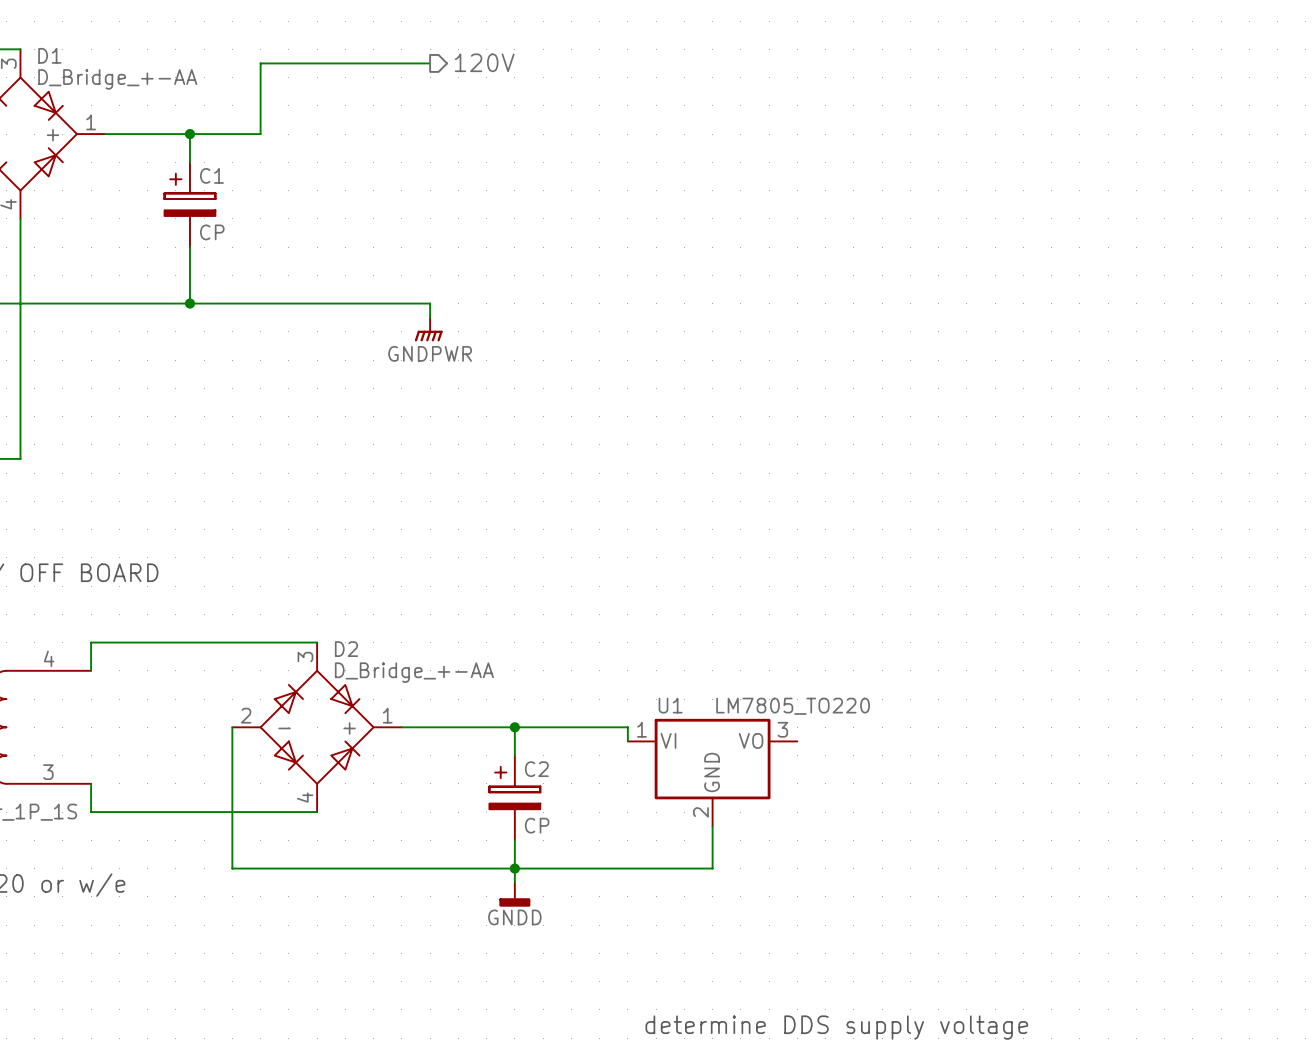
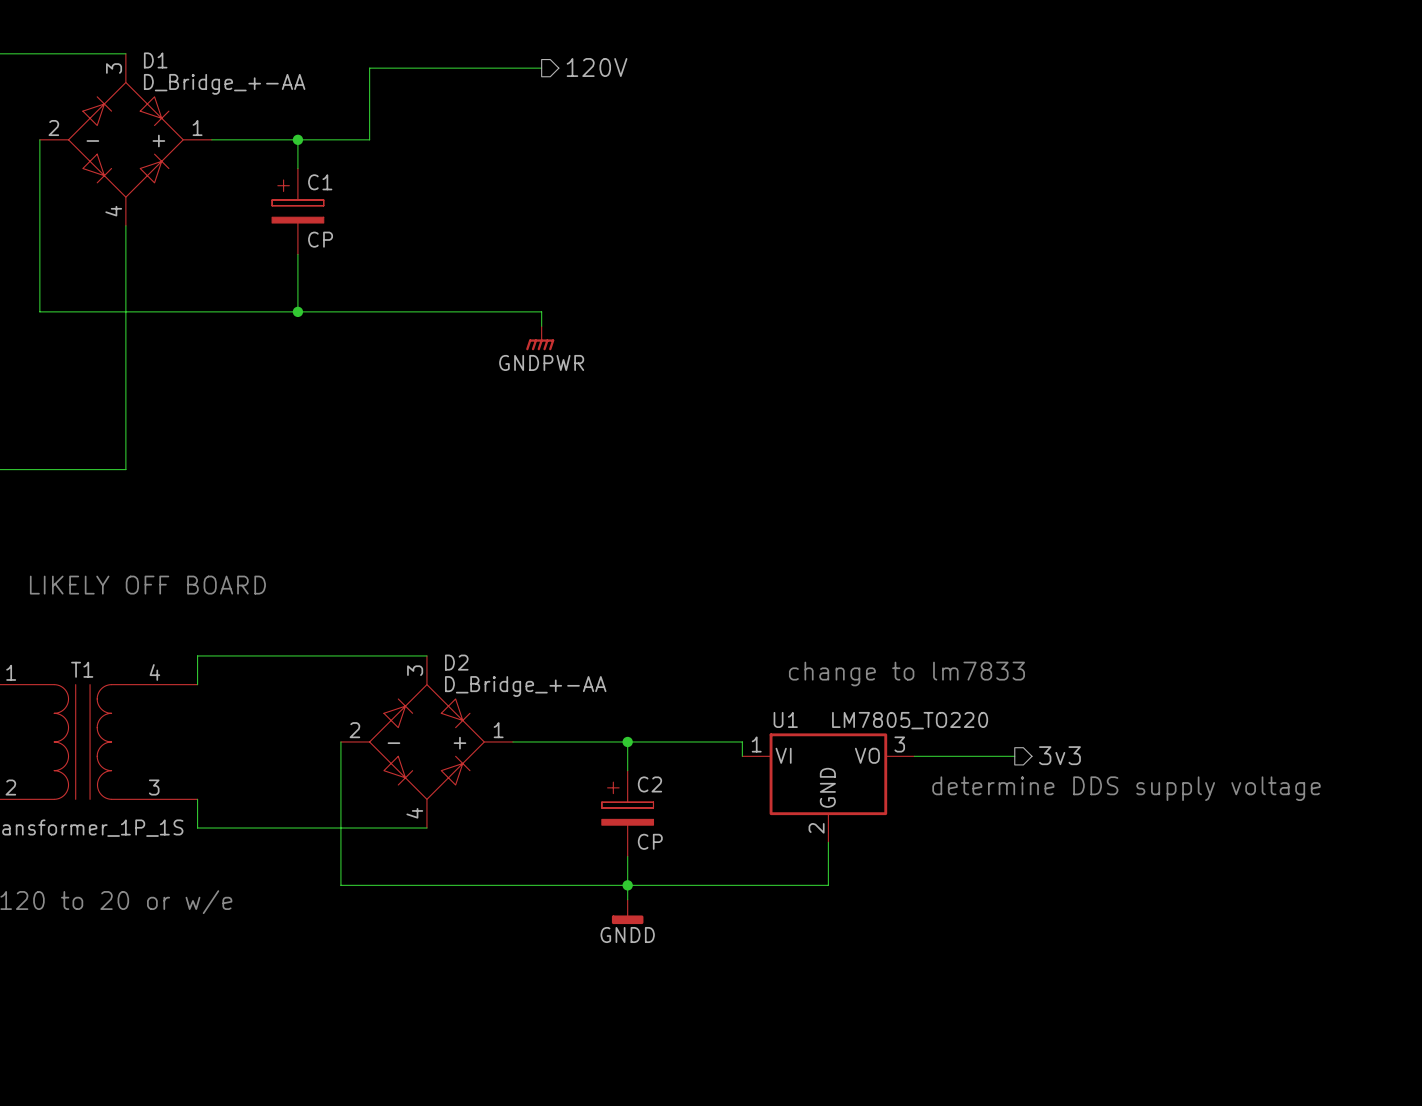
text: none -> change to lm7833 (906, 673)
hierarchical label: none -> 3v3 (1059, 755)
wire: none -> (914, 756) (1014, 756)
text: none -> determine DDS supply voltage (1126, 788)
text: determine DDS supply voltage (836, 1027) -> none

